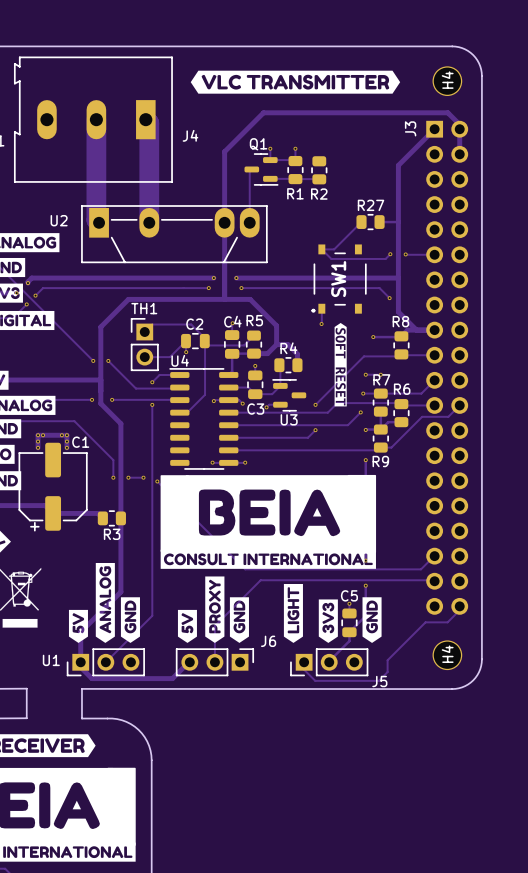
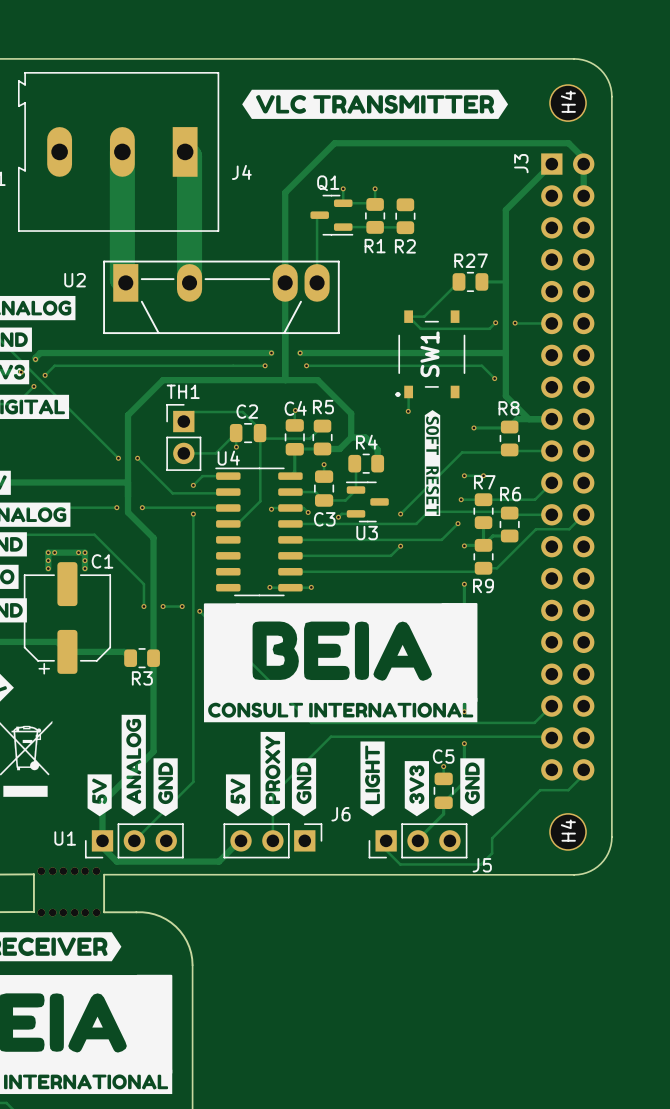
part: none -> (47, 871)
part: none -> (69, 871)
part: none -> (90, 871)
part: none -> (47, 912)
part: none -> (69, 912)
part: none -> (90, 912)

